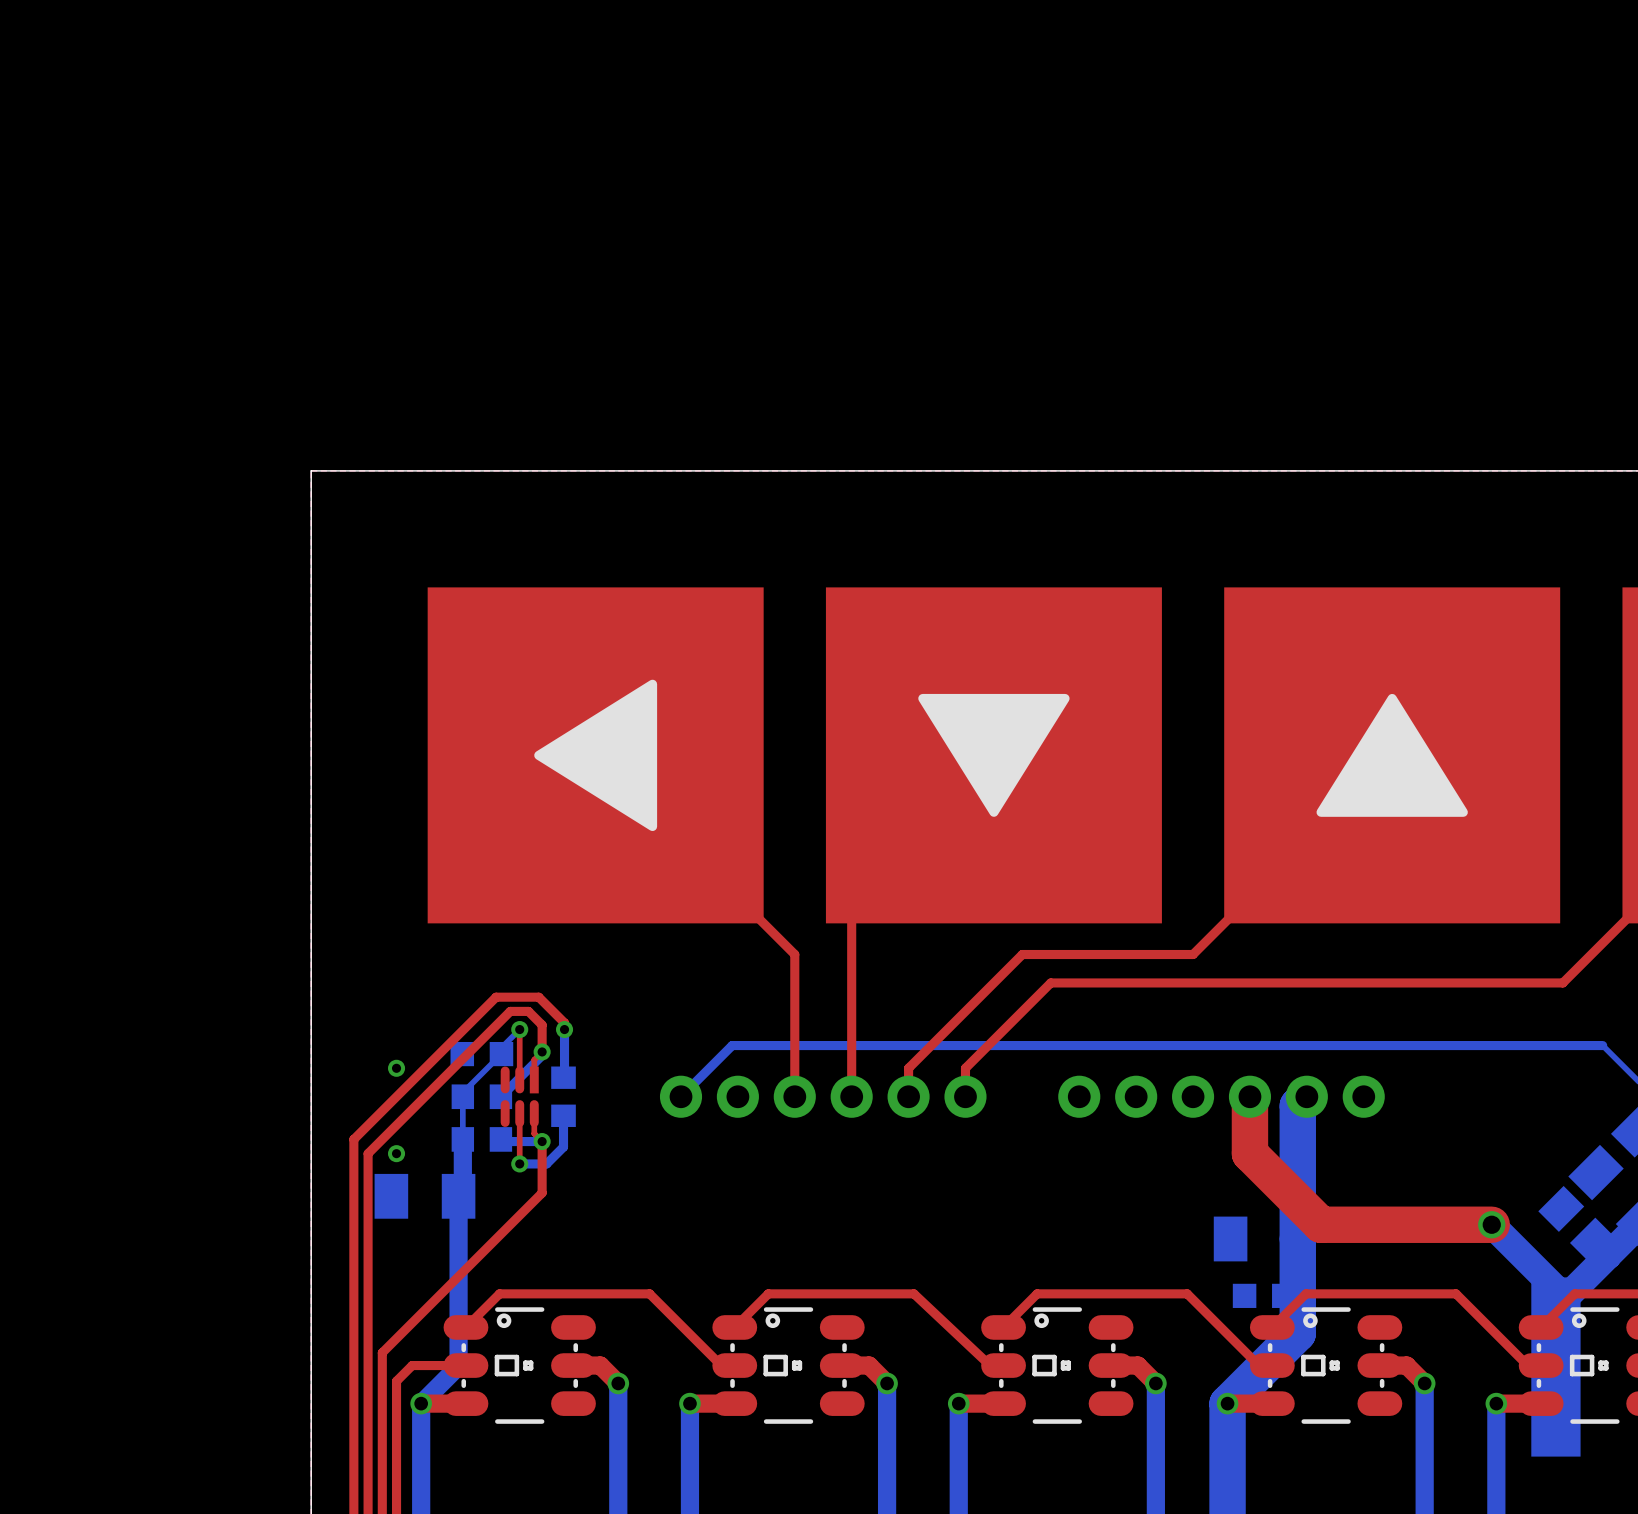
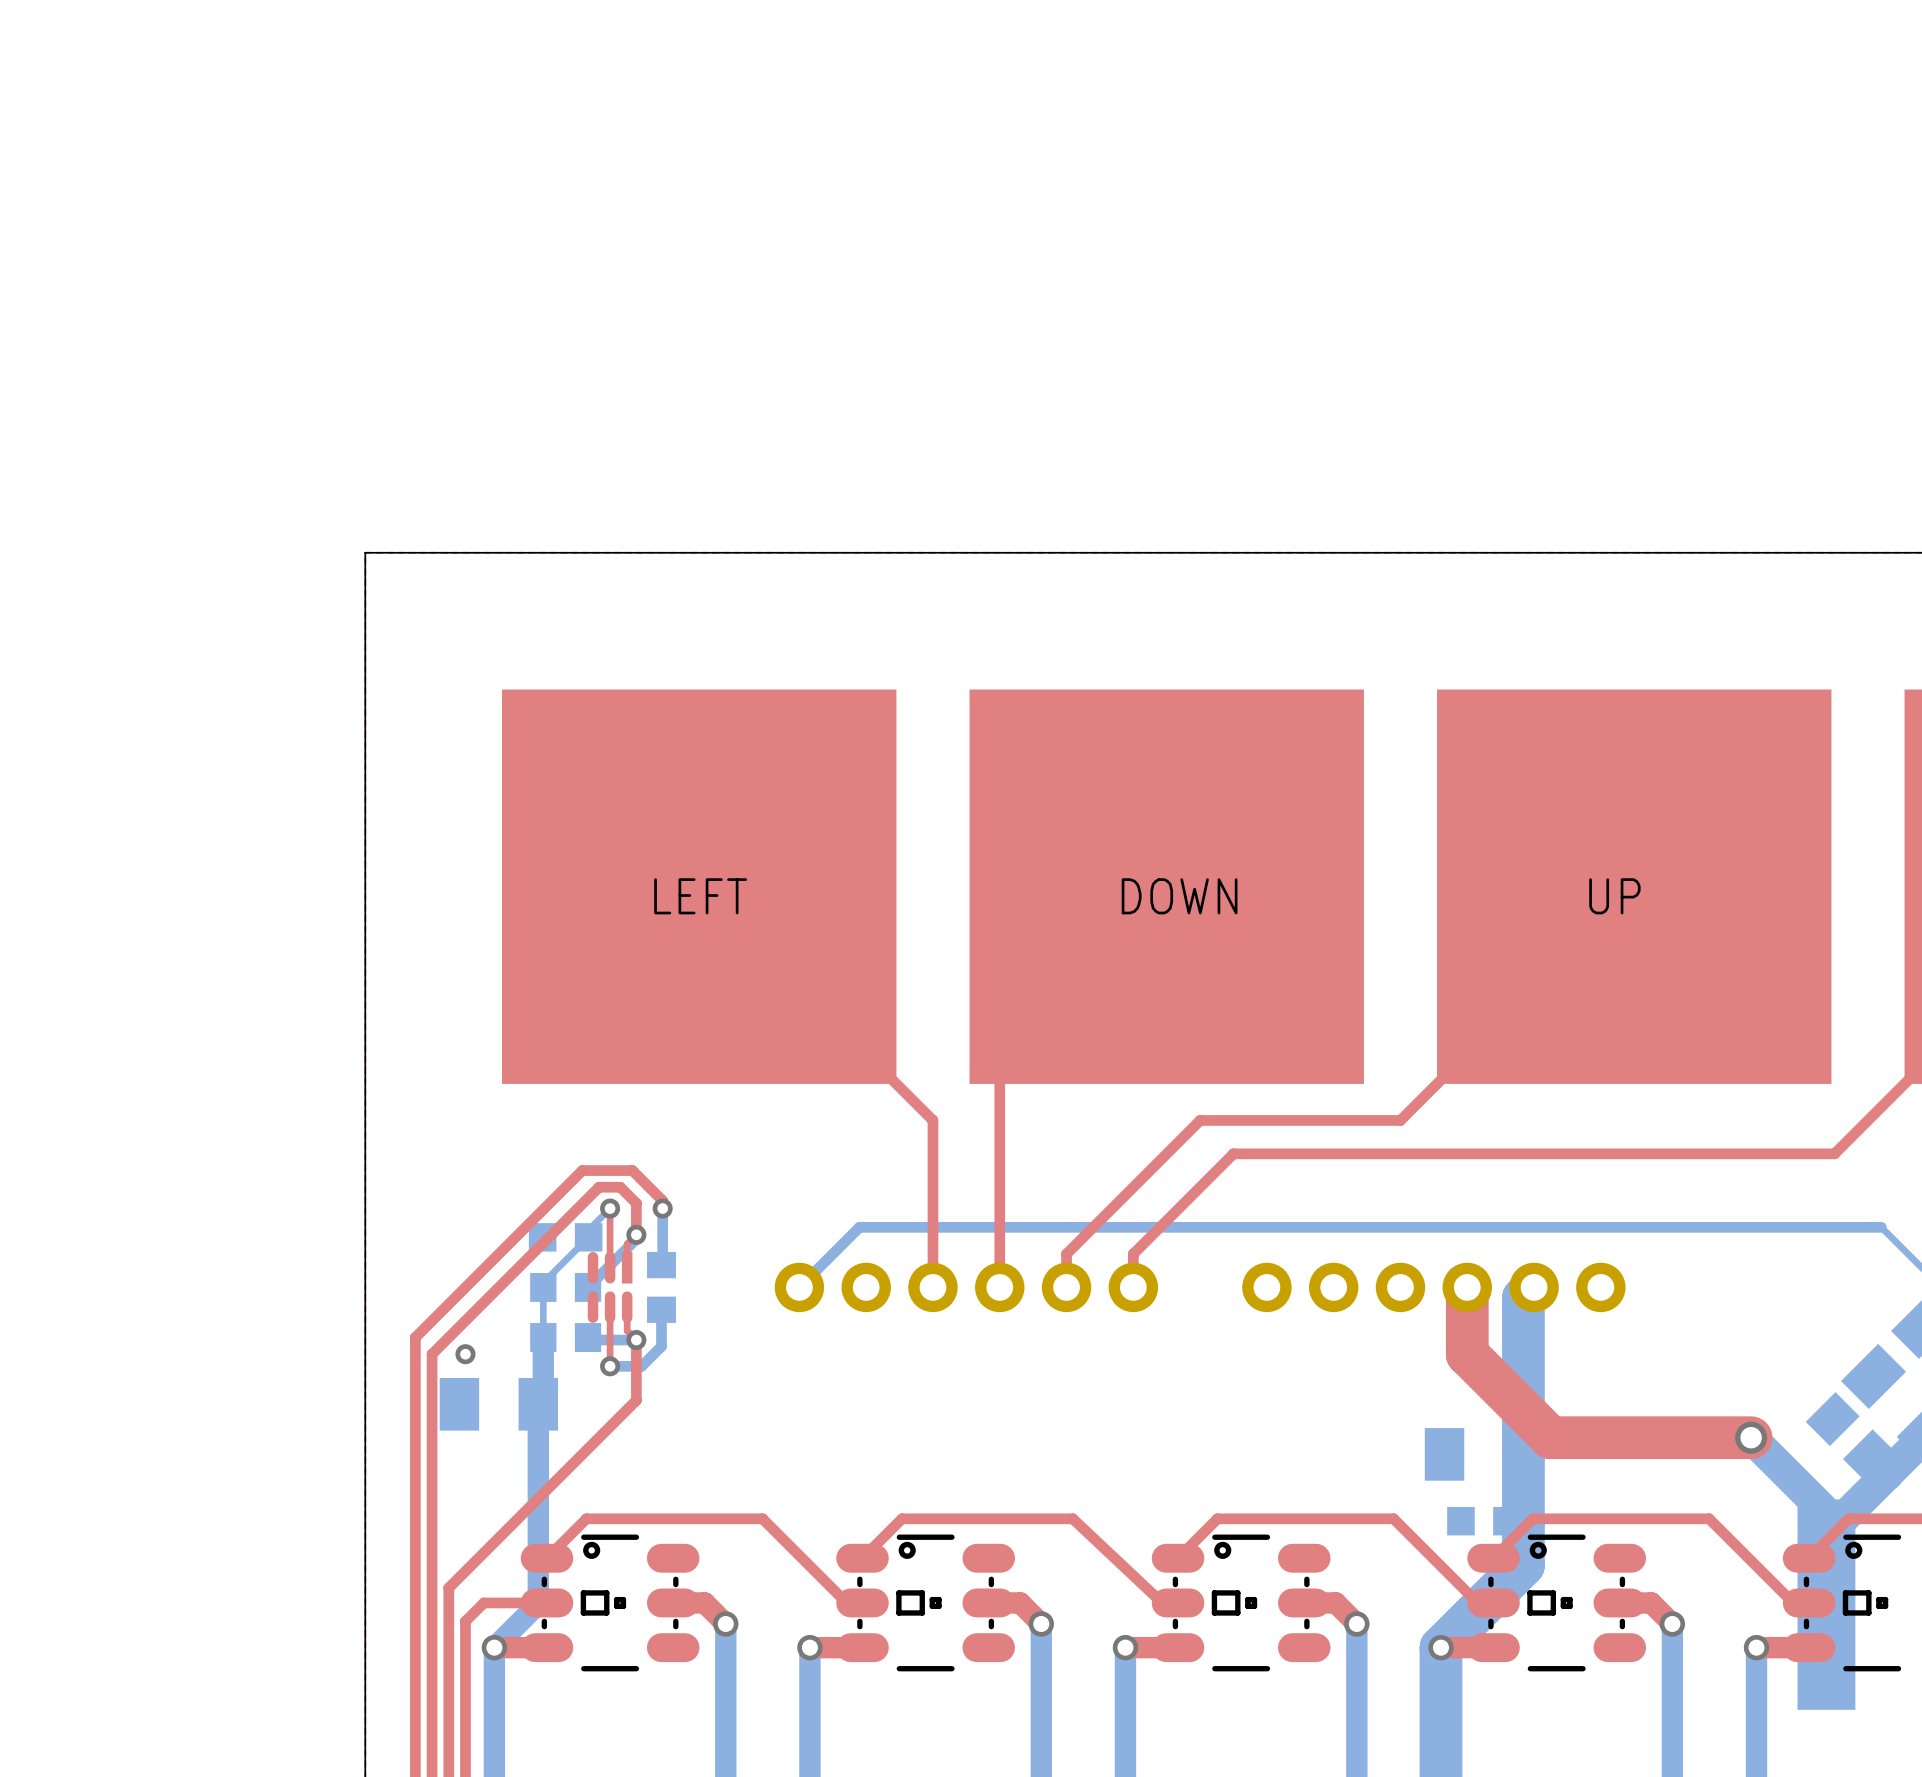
drawing: [534, 679, 658, 832] -> none
drawing: [918, 693, 1070, 817] -> none
drawing: [1316, 693, 1468, 817] -> none
LEFT name: none -> LEFT (700, 896)
DOWN name: none -> DOWN (1179, 896)
UP name: none -> UP (1614, 896)
via: (396, 1068) -> none

